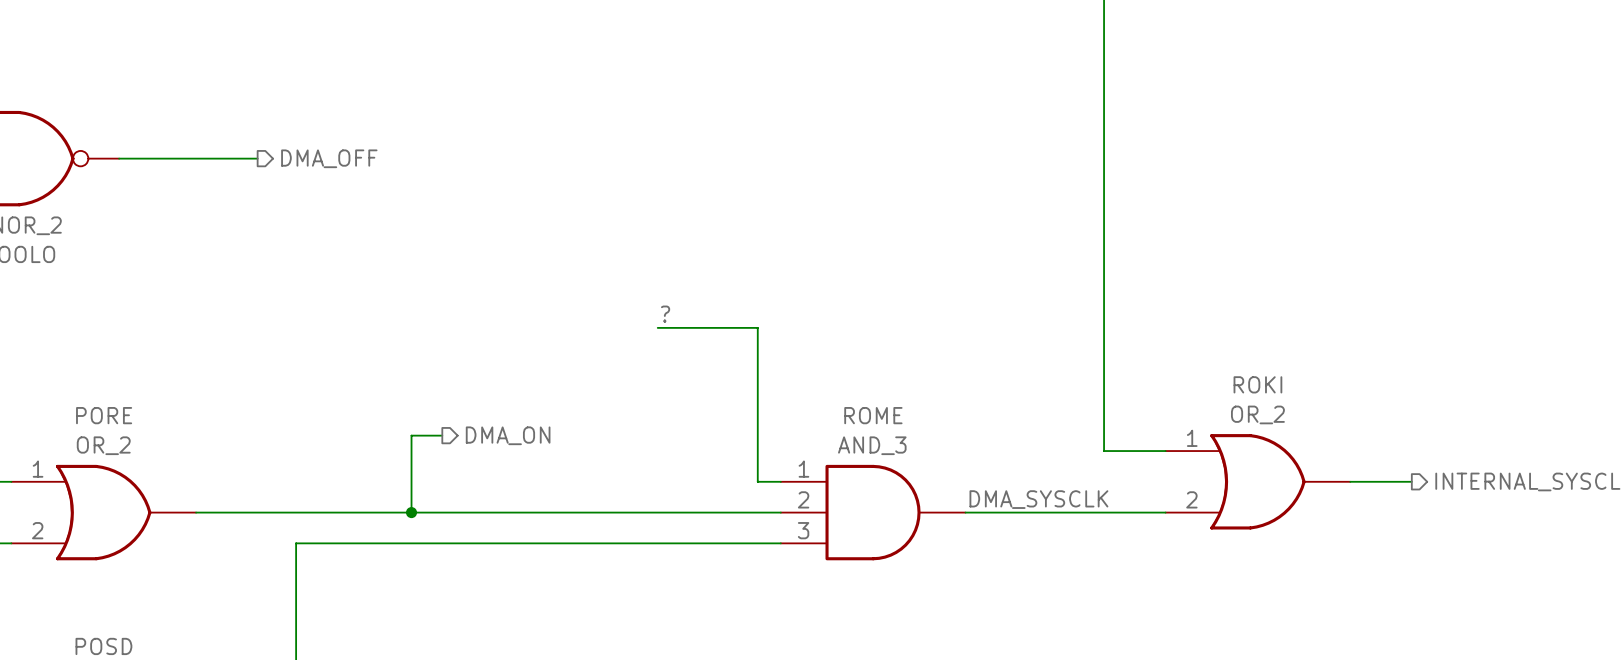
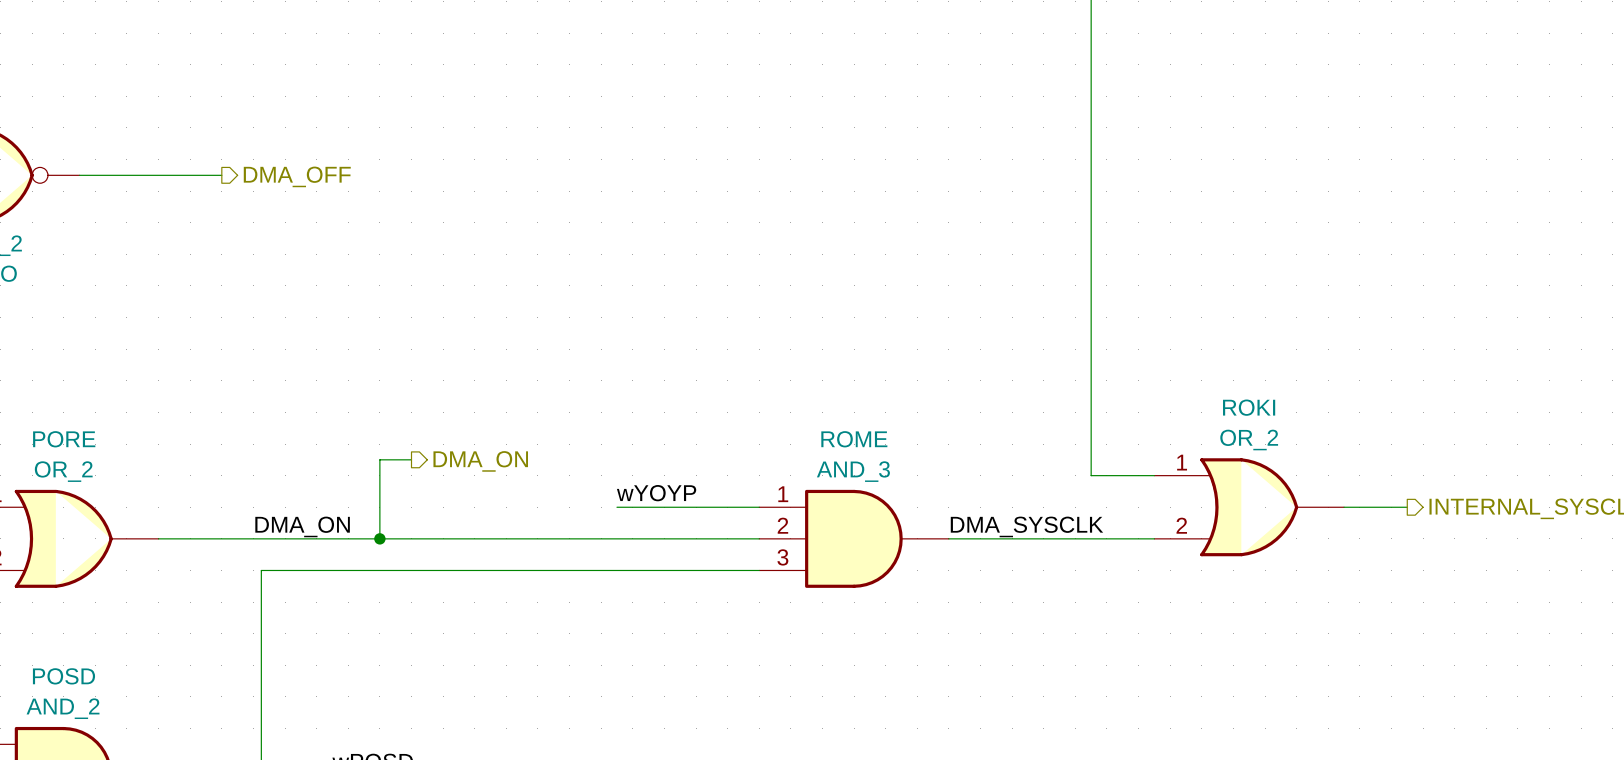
label: ? (665, 314) -> none
wire: (657, 327) (757, 327) (757, 481) -> (616, 507) (735, 507)
label: none -> wYOYP (656, 493)
label: none -> DMA_ON (302, 526)

